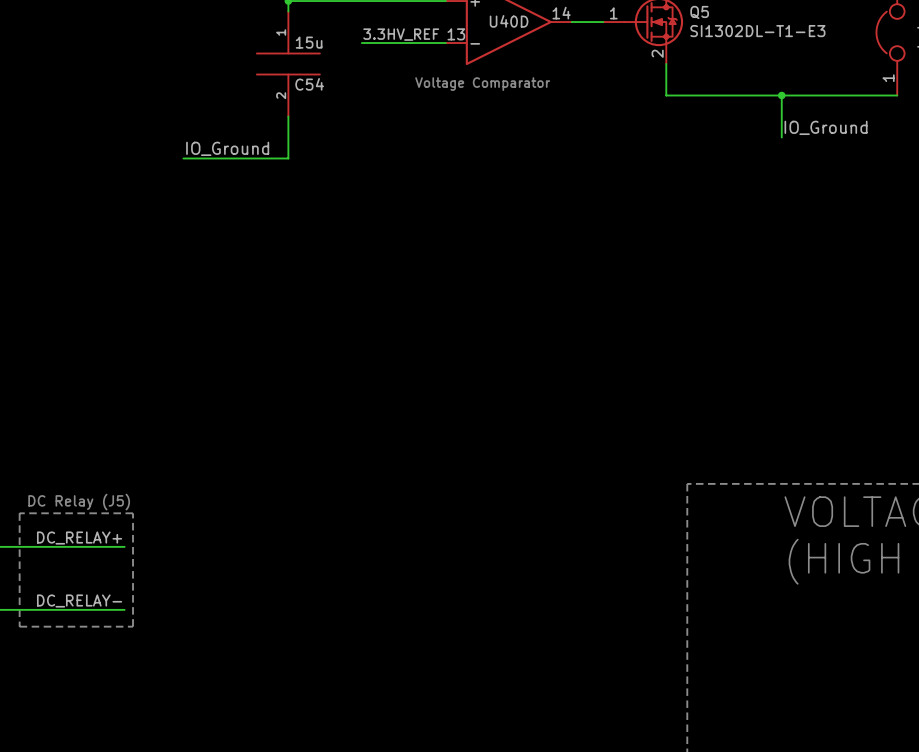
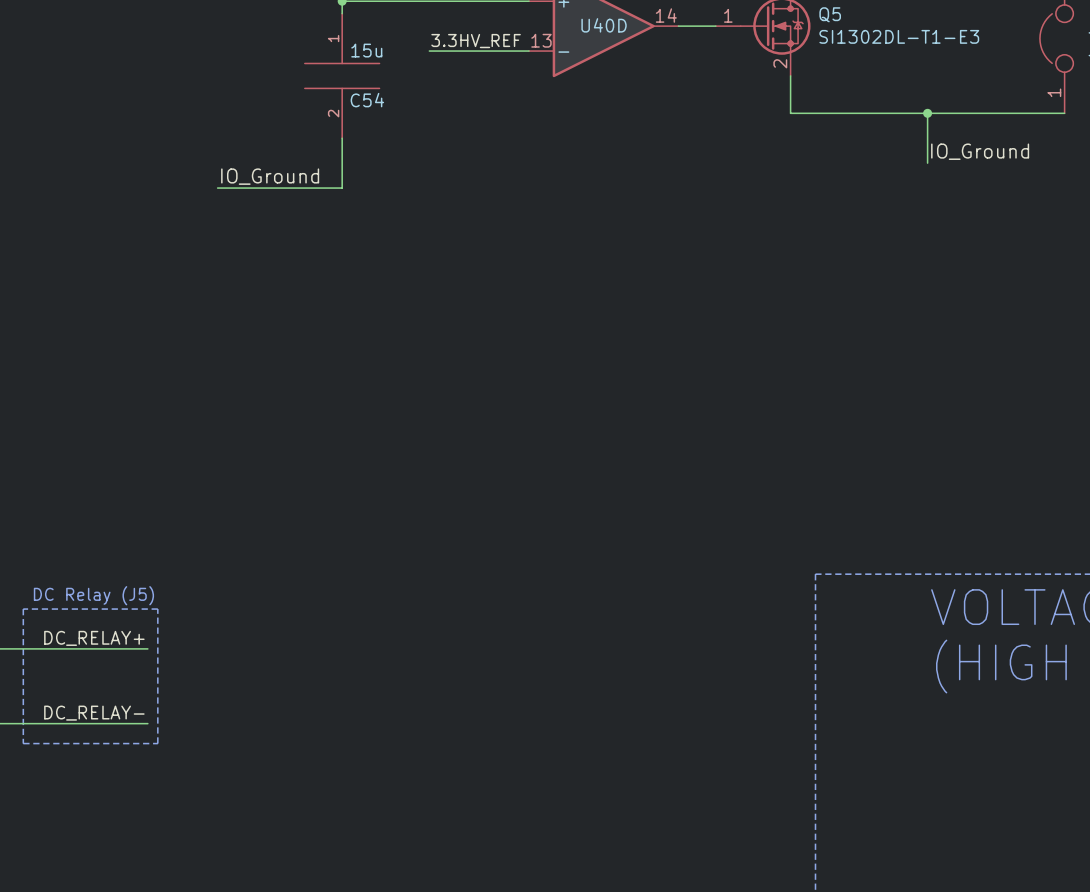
text: Voltage Comparator (482, 84) -> none

